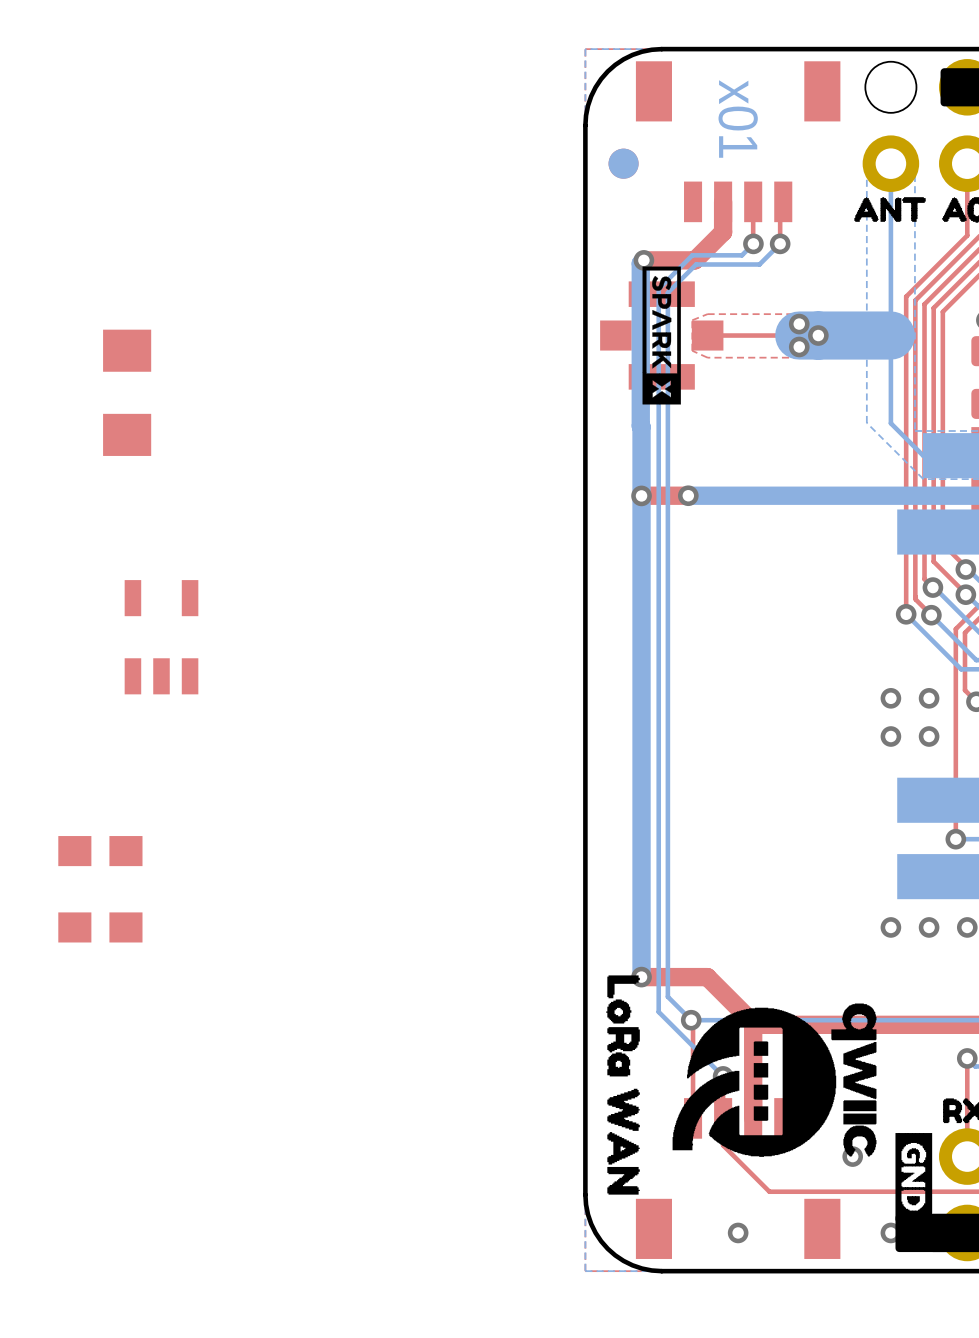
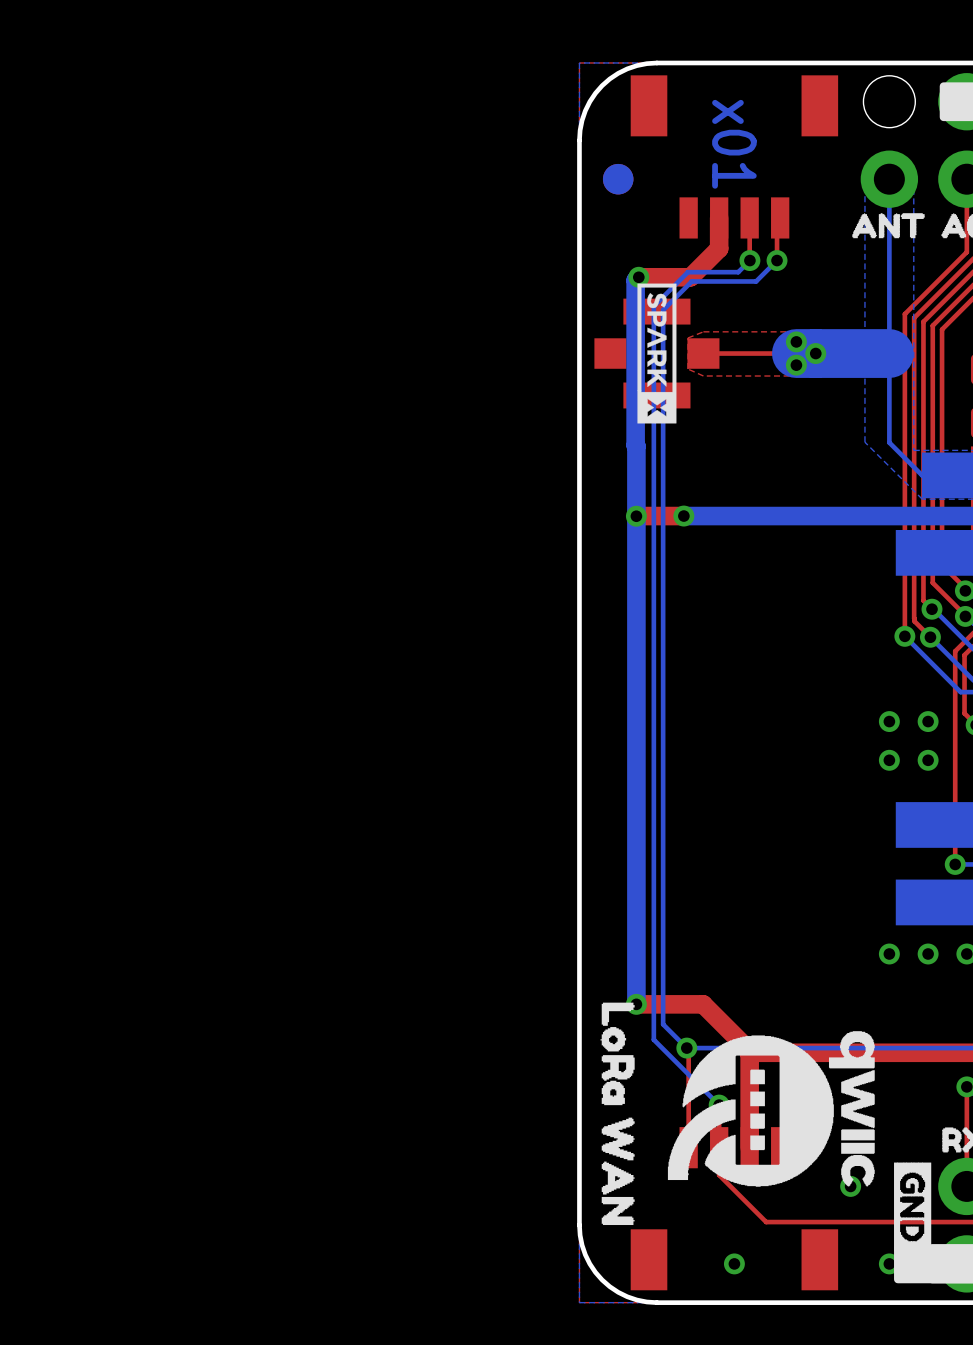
part: (127, 392) -> none
part: (161, 637) -> none
part: (100, 851) -> none
part: (100, 927) -> none

